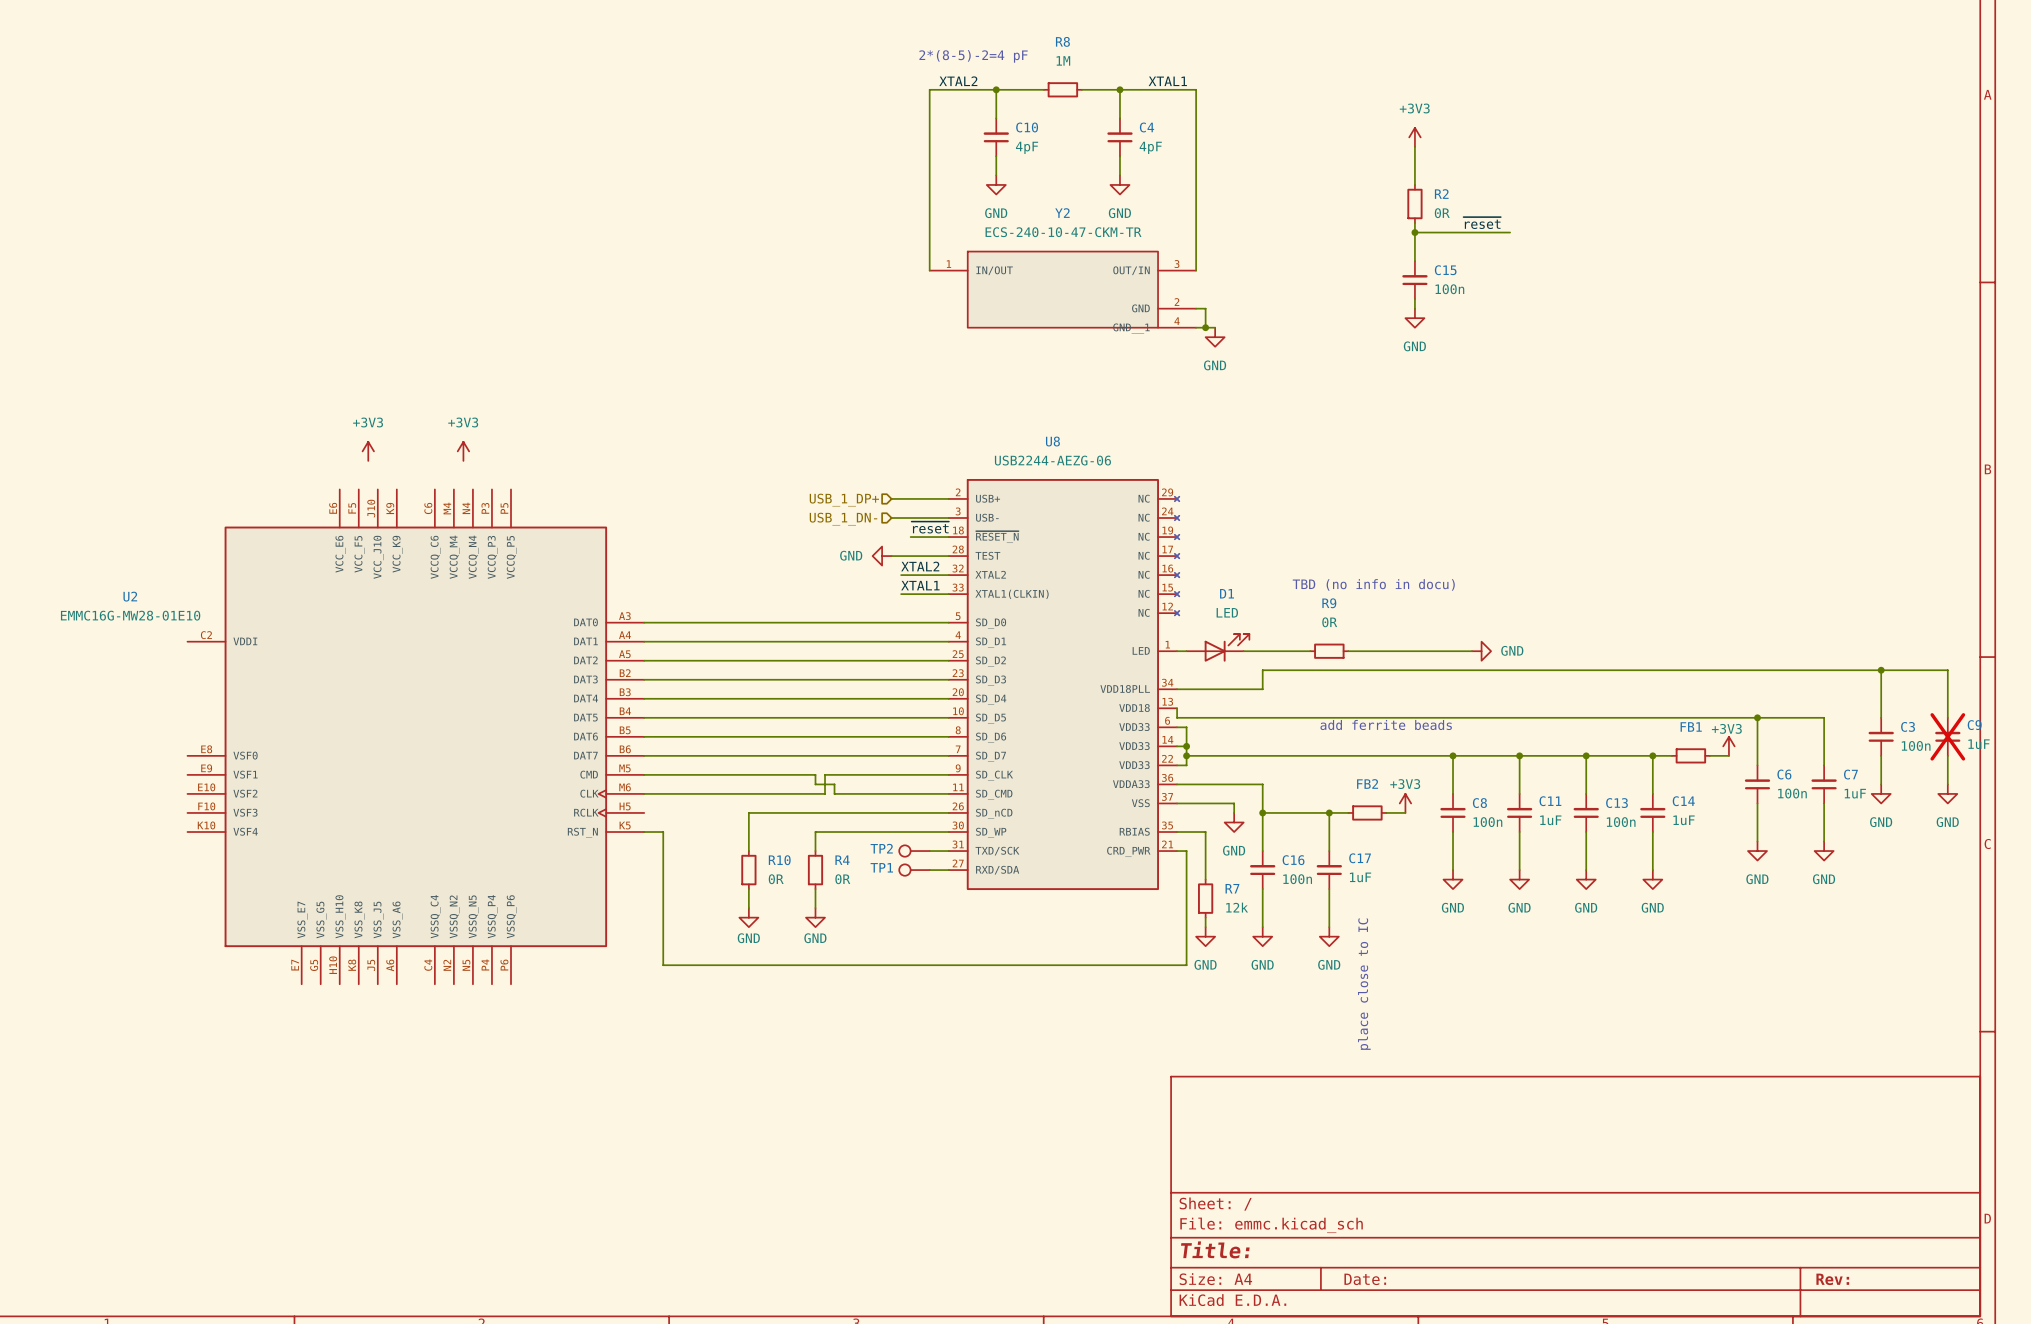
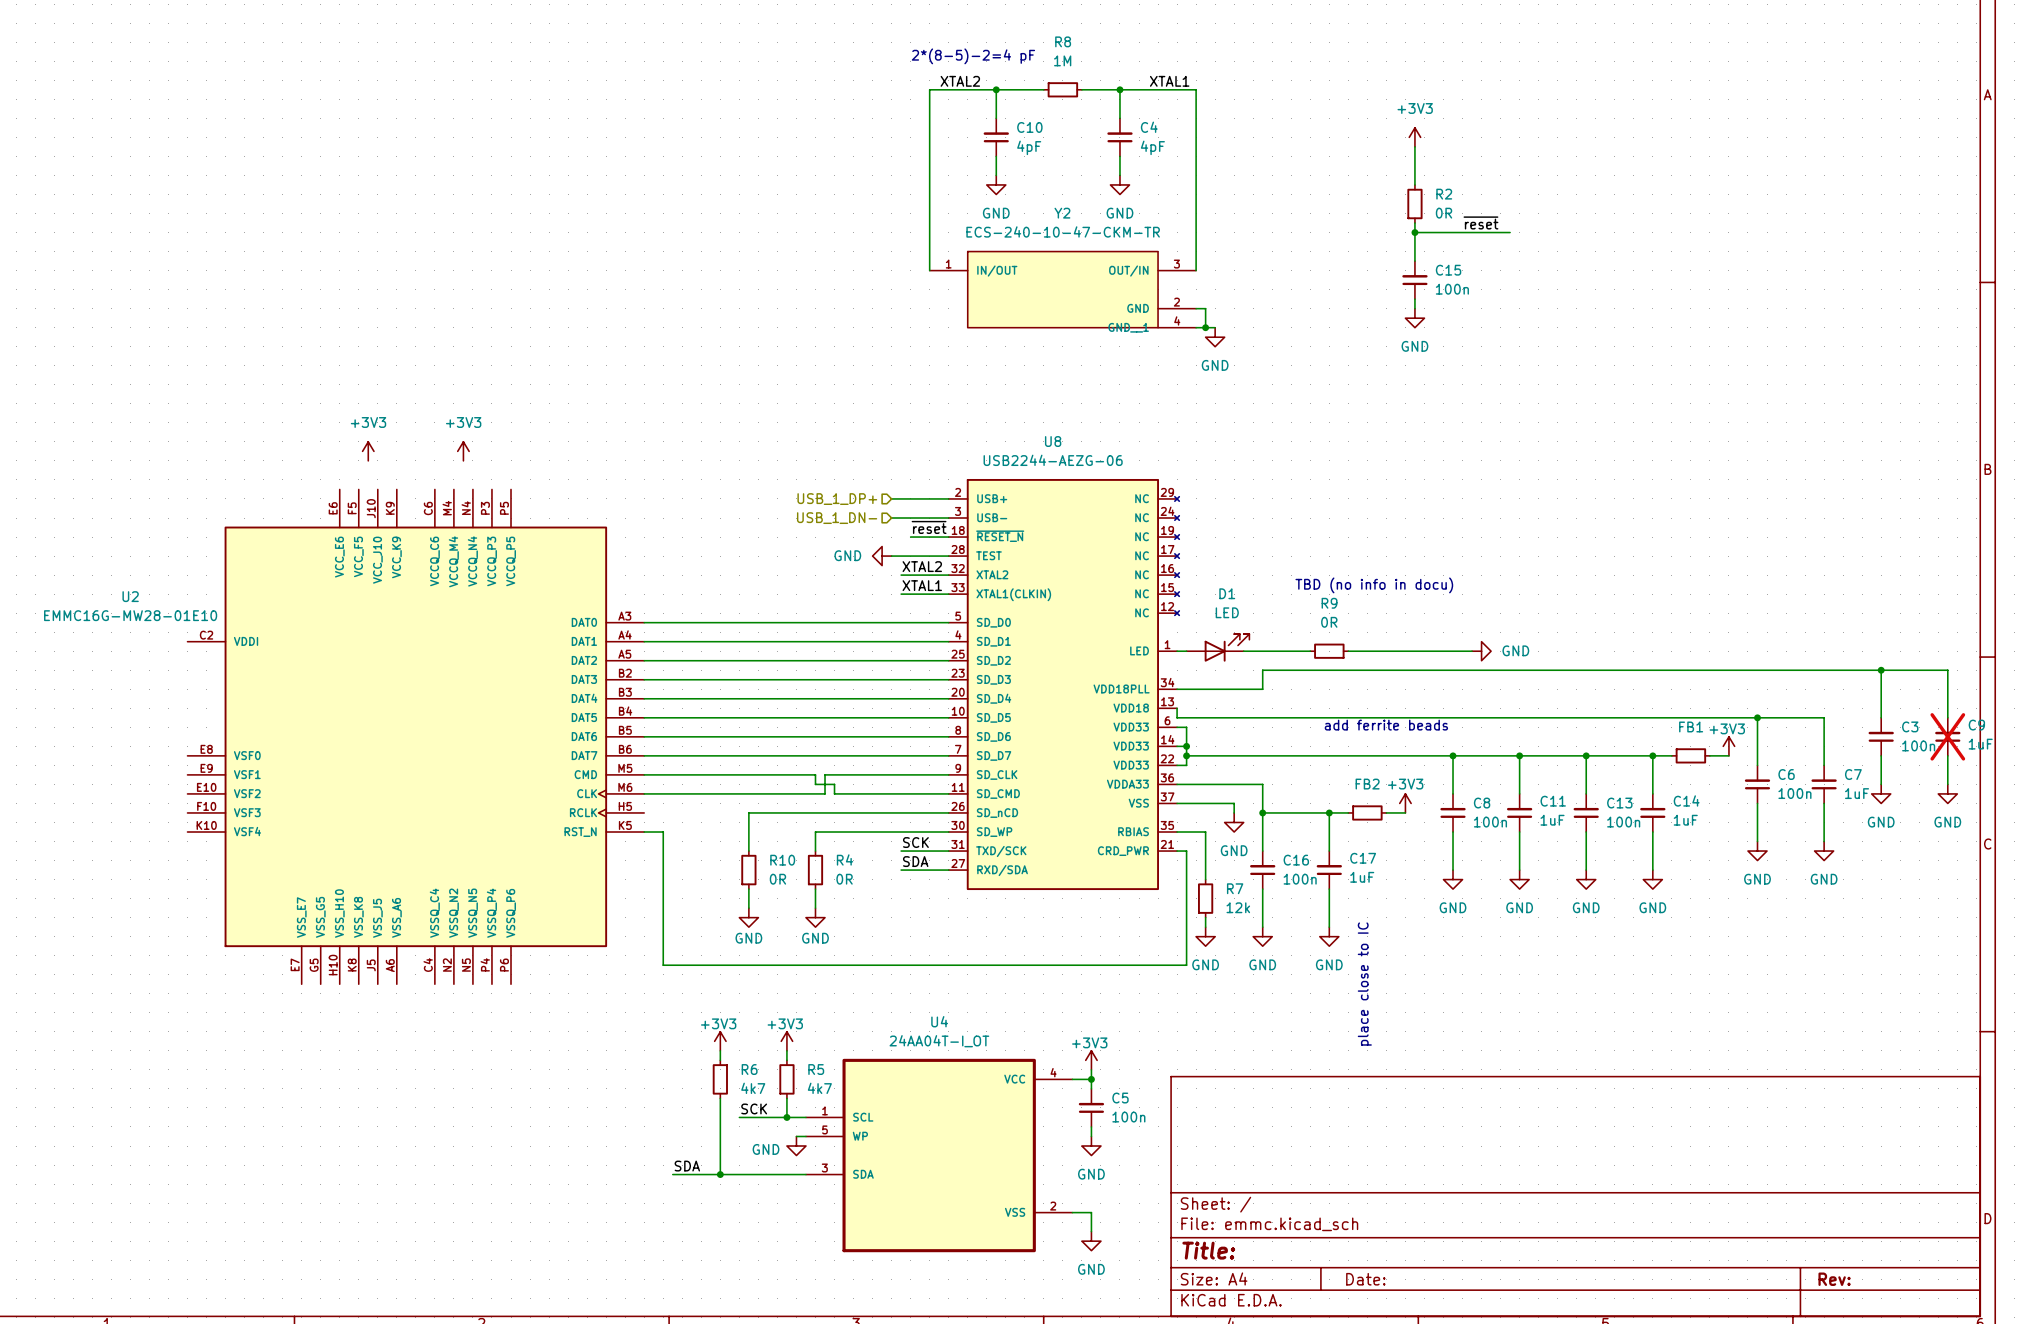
label: none -> SCK (915, 842)
TP2: (914, 851) -> none
label: none -> SDA (915, 861)
TP1: (914, 870) -> none
power symbol: none -> +3V3 (720, 1041)
power symbol: none -> +3V3 (786, 1041)
wire: none -> (720, 1050) (720, 1060)
wire: none -> (786, 1050) (786, 1060)
power symbol: none -> +3V3 (1091, 1060)
wire: none -> (1091, 1069) (1091, 1088)
R6: none -> (720, 1079)
R5: none -> (786, 1079)
wire: none -> (1072, 1079) (1091, 1079)
junction: none -> (1091, 1079)
wire: none -> (720, 1098) (720, 1174)
wire: none -> (786, 1098) (786, 1117)
C5: none -> (1091, 1107)
label: none -> SCK (754, 1108)
wire: none -> (739, 1117) (805, 1117)
junction: none -> (786, 1117)
wire: none -> (1091, 1126) (1091, 1136)
wire: none -> (796, 1136) (805, 1136)
power symbol: none -> GND (796, 1146)
power symbol: none -> GND (1091, 1146)
U4: none -> 24AA04T-I_OT (939, 1155)
label: none -> SDA (687, 1166)
wire: none -> (672, 1174) (805, 1174)
junction: none -> (720, 1174)
wire: none -> (1072, 1212) (1091, 1212) (1091, 1231)
power symbol: none -> GND (1091, 1241)

